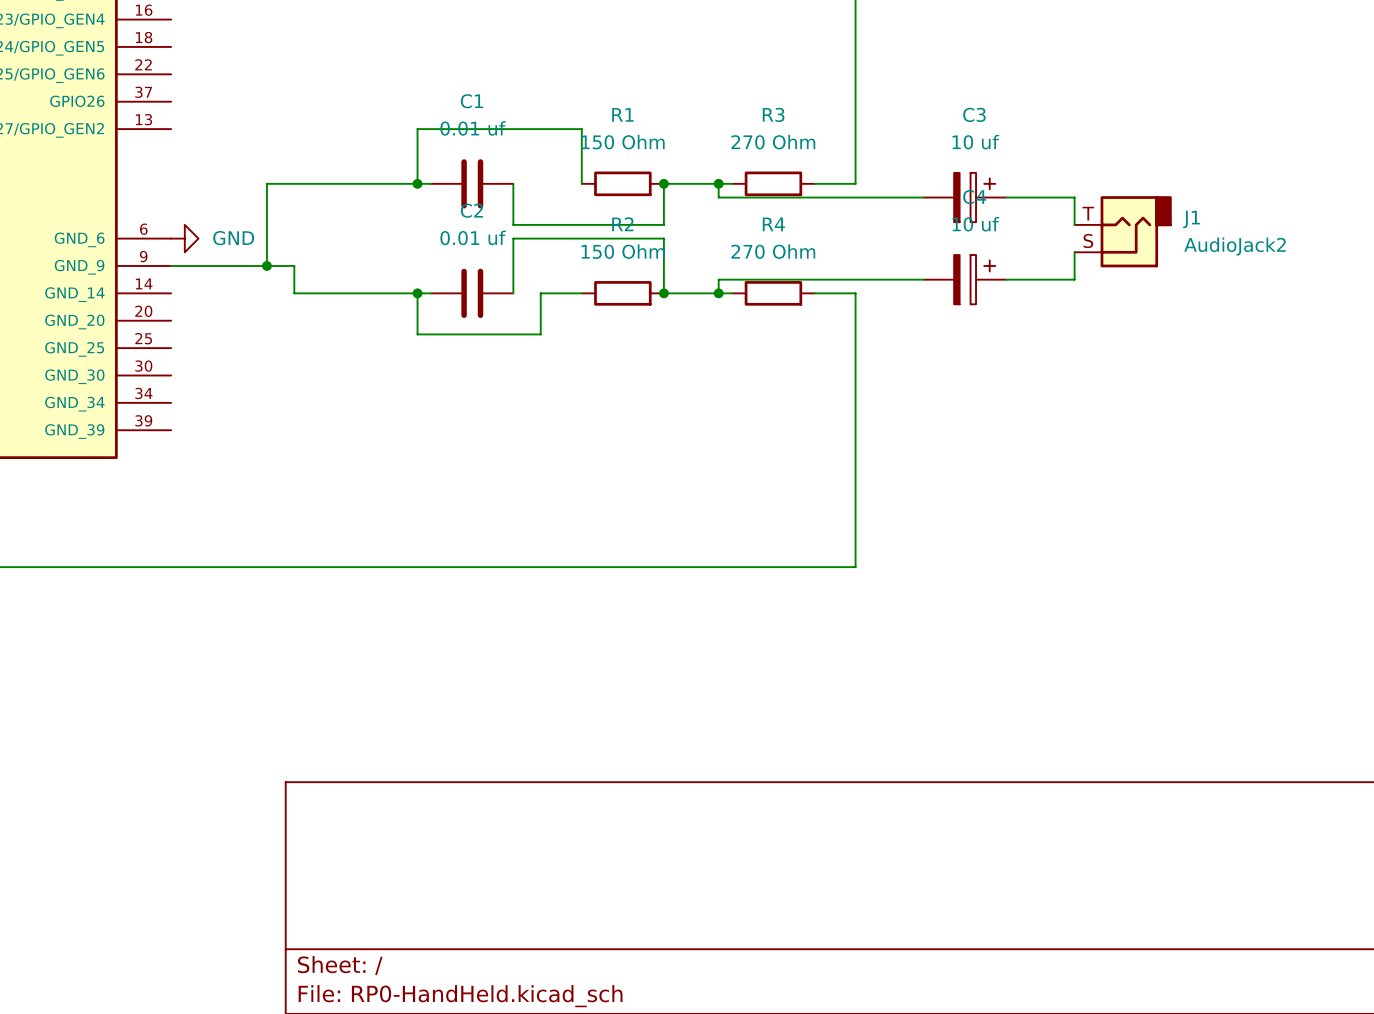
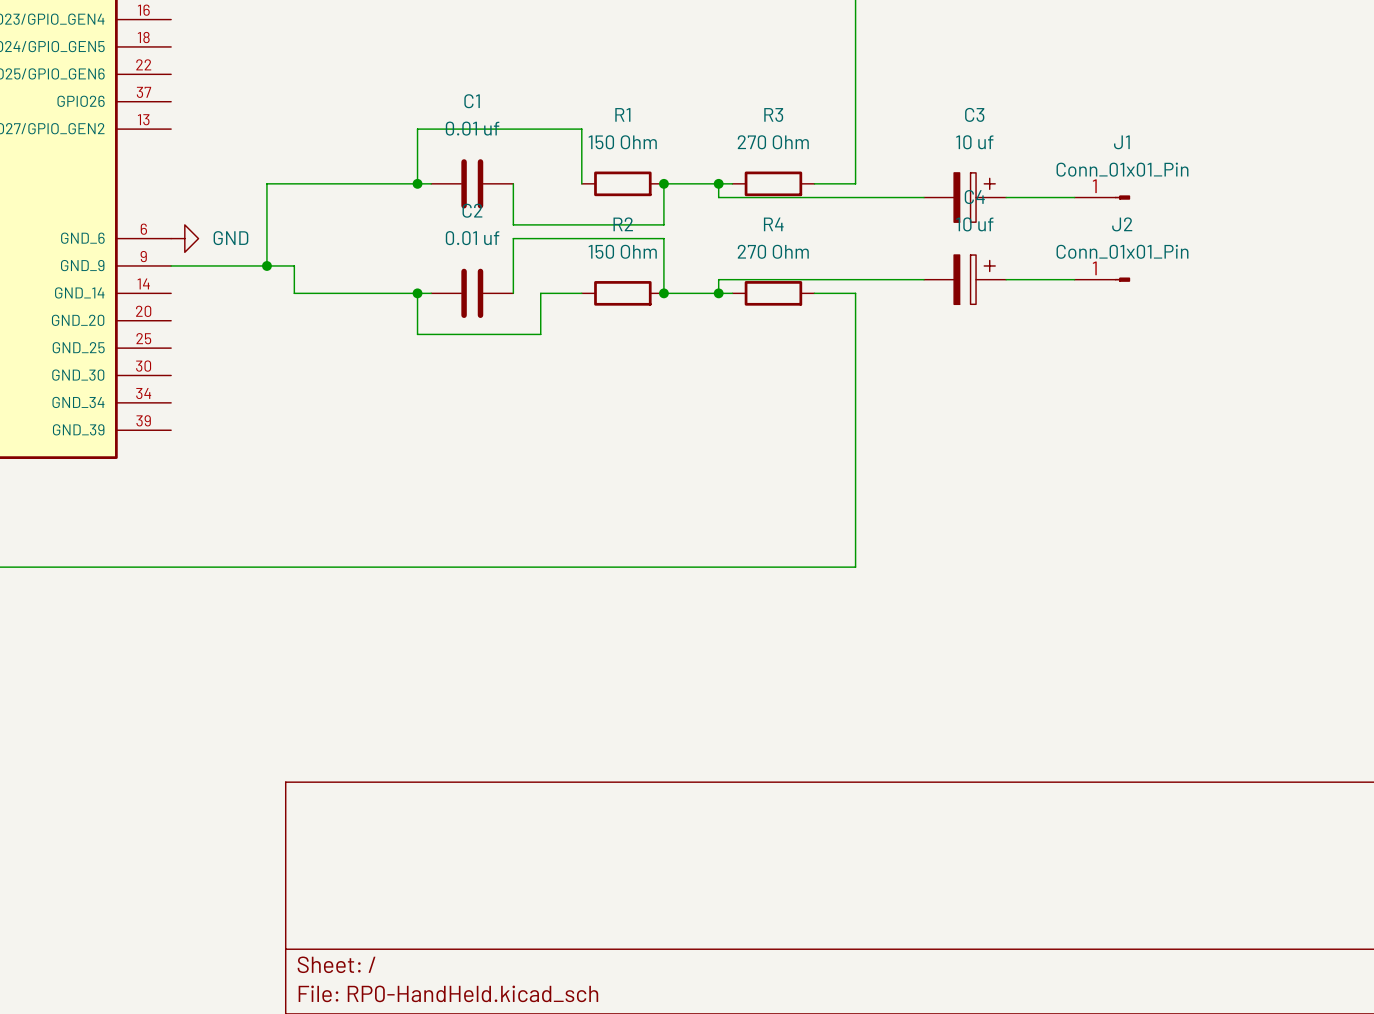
J1 symbol: [1074, 196, 1172, 268] -> [1074, 195, 1131, 200]
wire: (1074, 197) (1074, 224) -> none
J1 name position: J1 (1191, 219) -> J1 (1121, 142)
J1 value: AudioJack2 (1235, 246) -> Conn_01x01_Pin (1122, 169)
wire: (1074, 252) (1074, 279) -> none
J2: none -> Conn_01x01_Pin (1102, 279)

